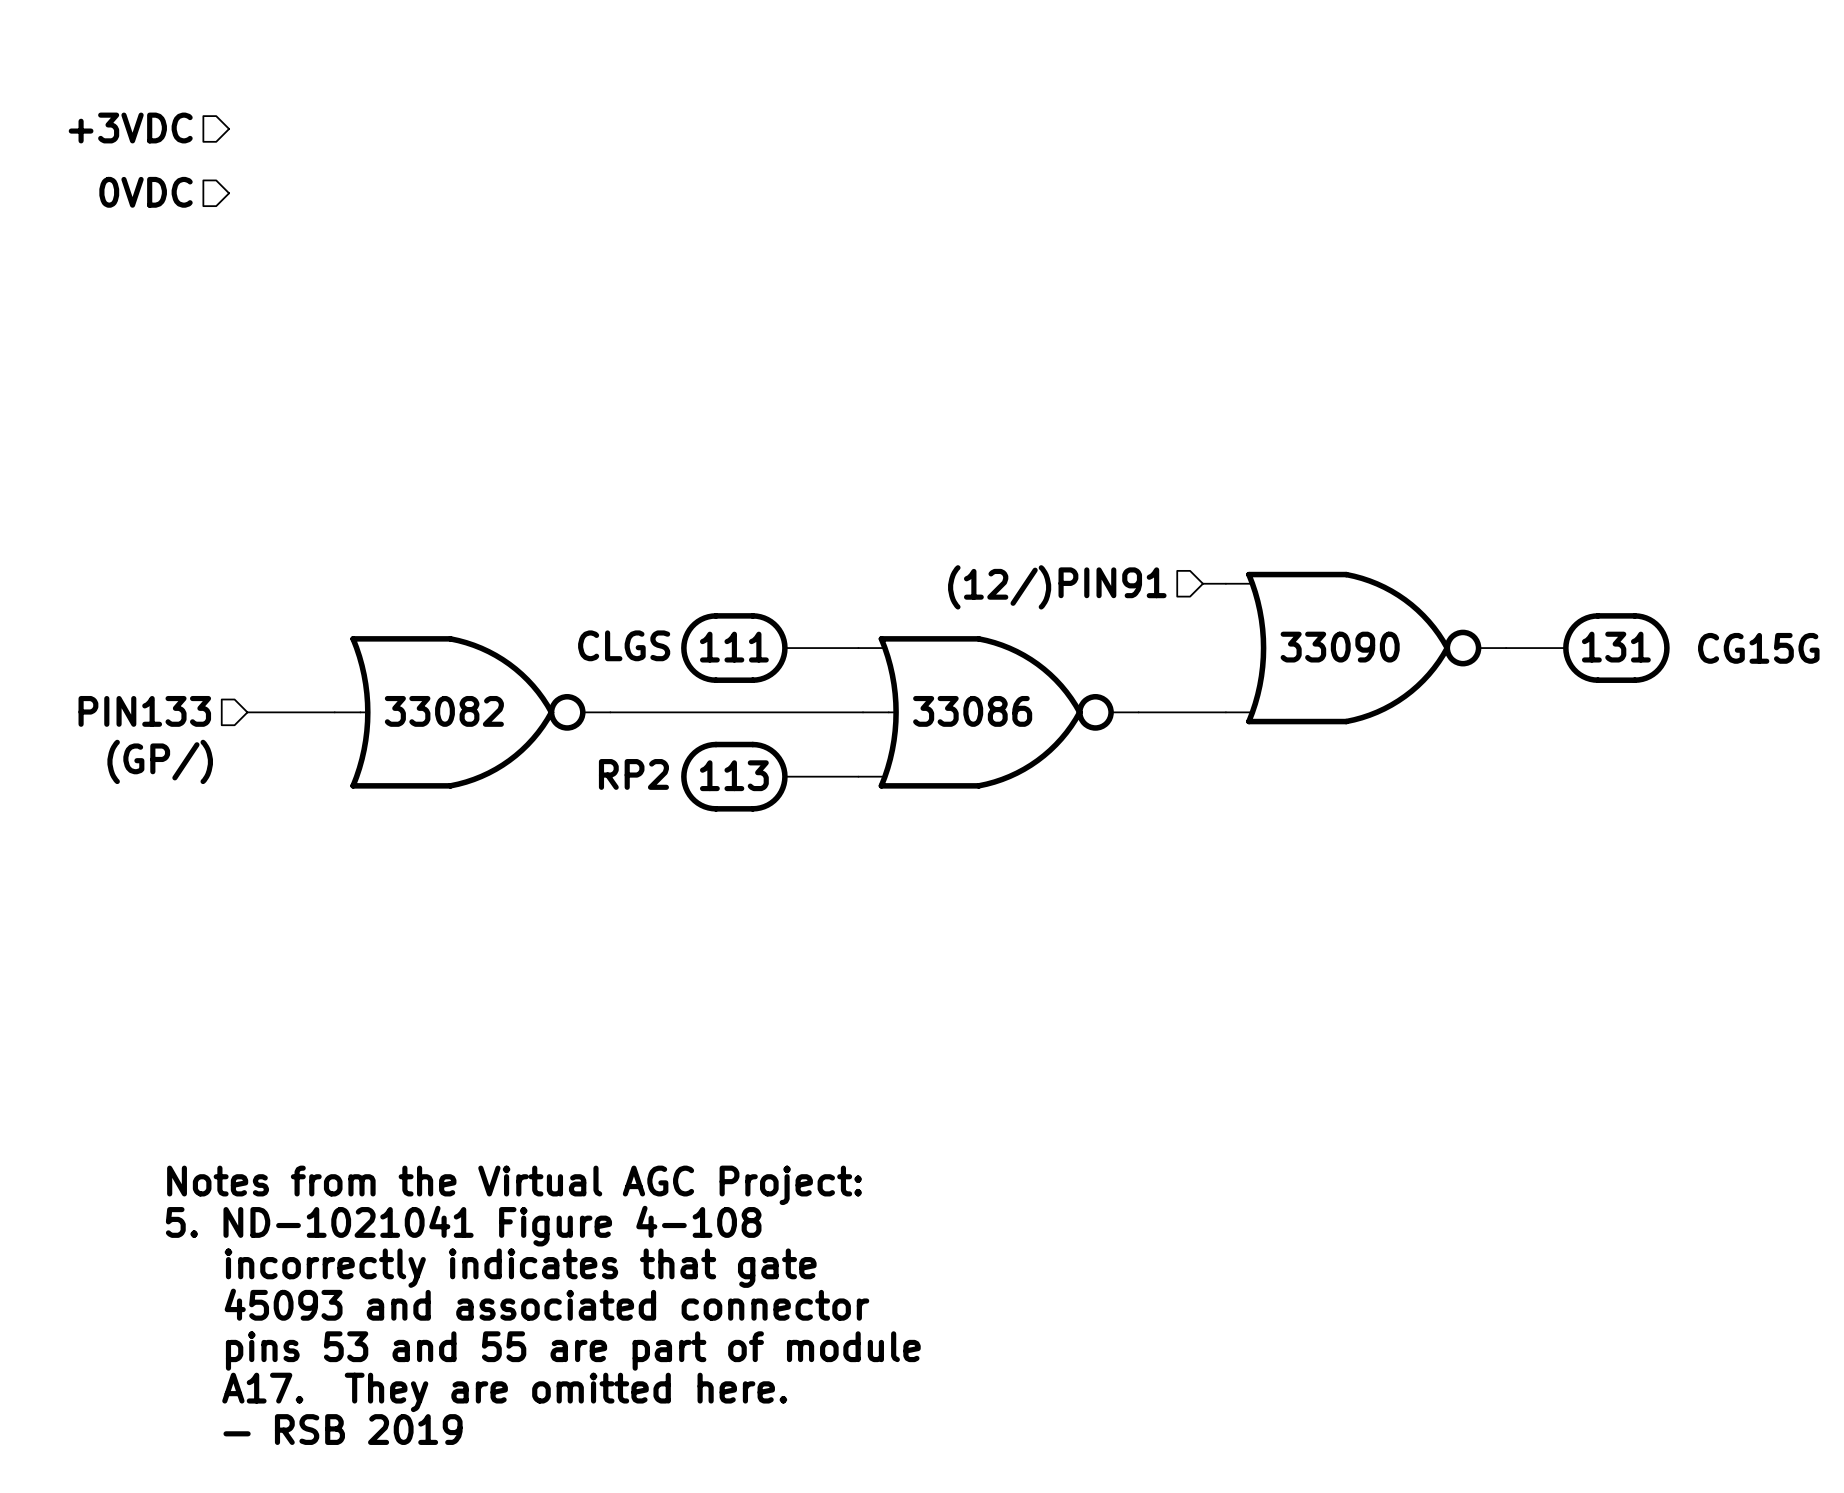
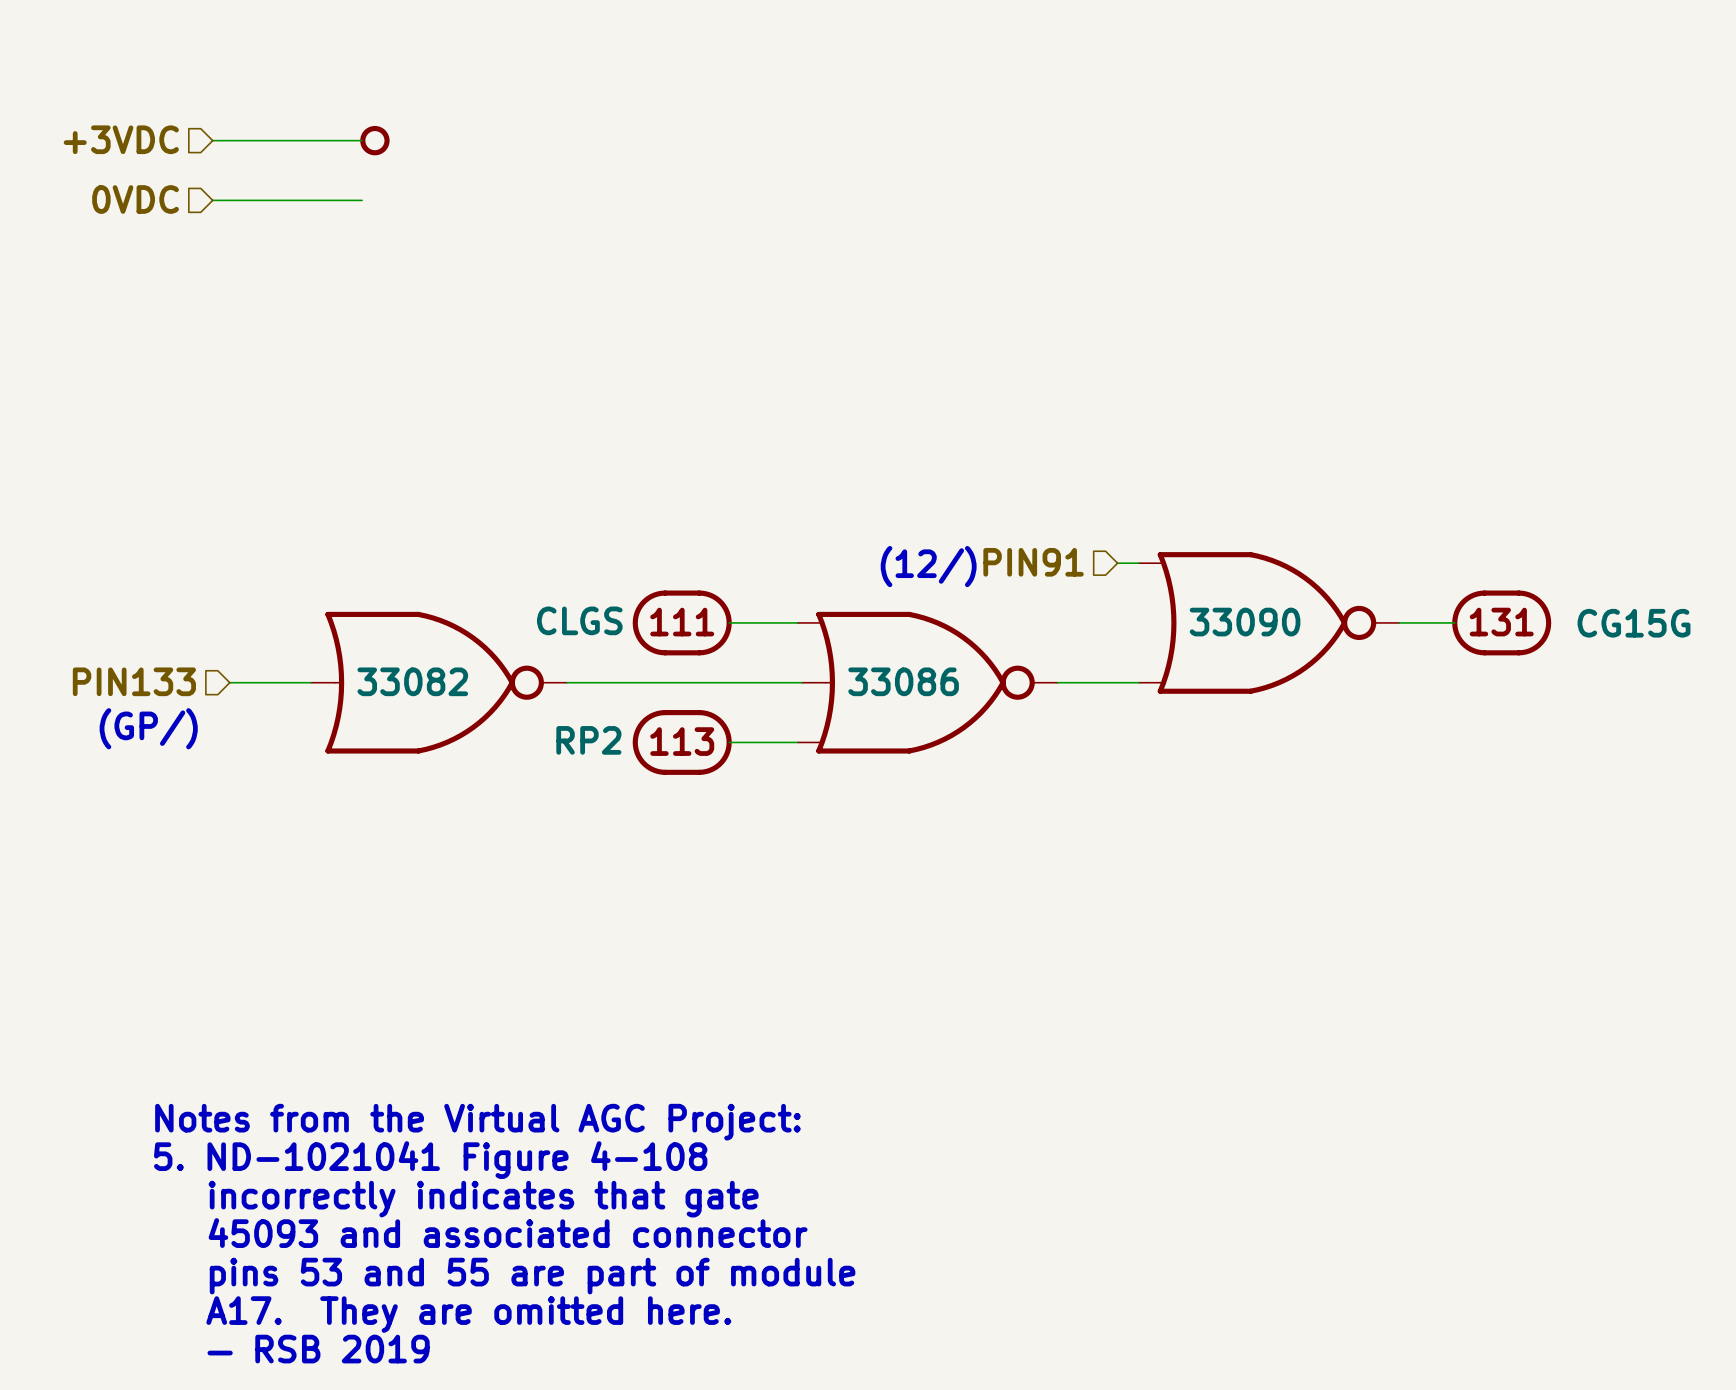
wire: none -> (212, 140) (362, 140)
part: none -> (374, 140)
wire: none -> (212, 200) (362, 200)

